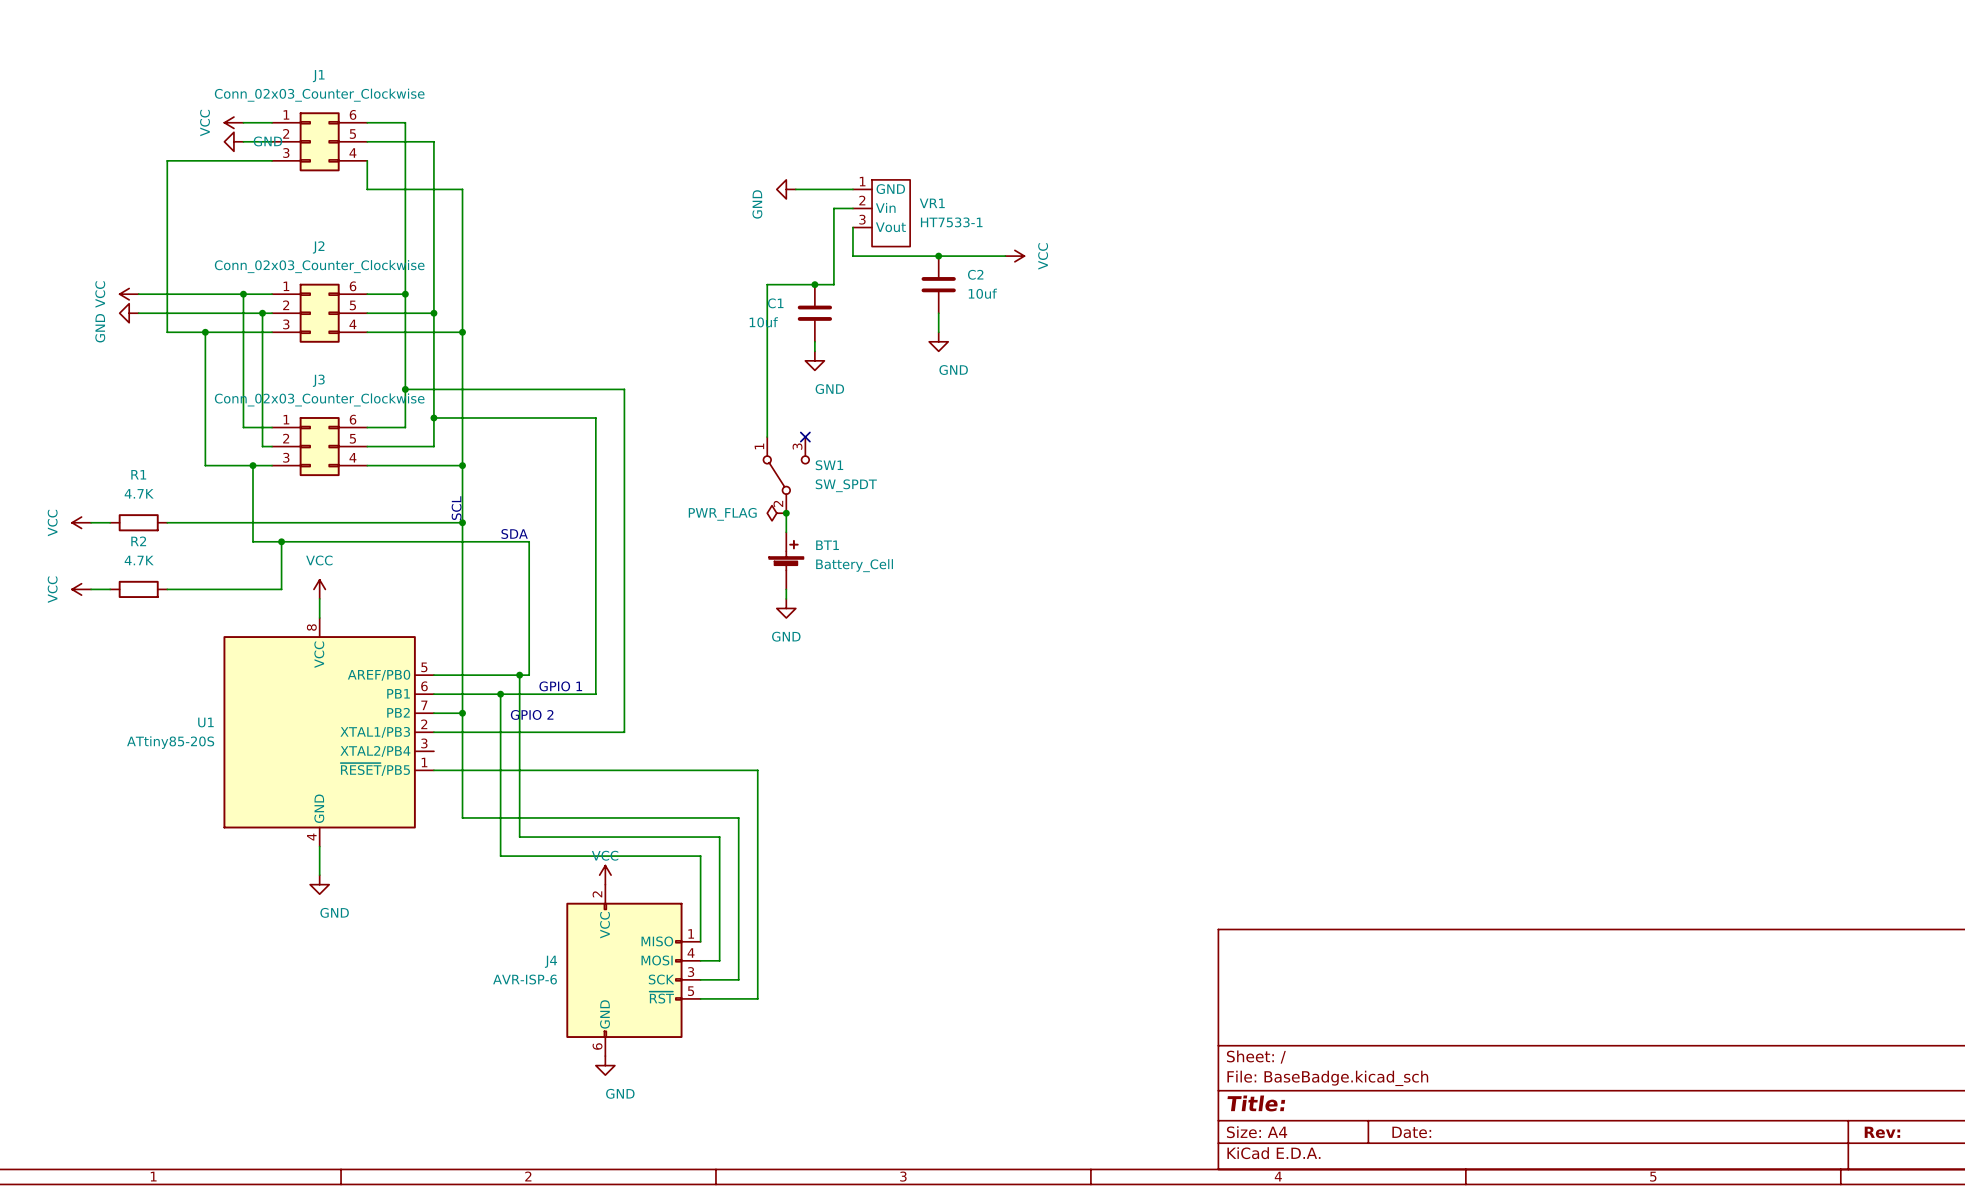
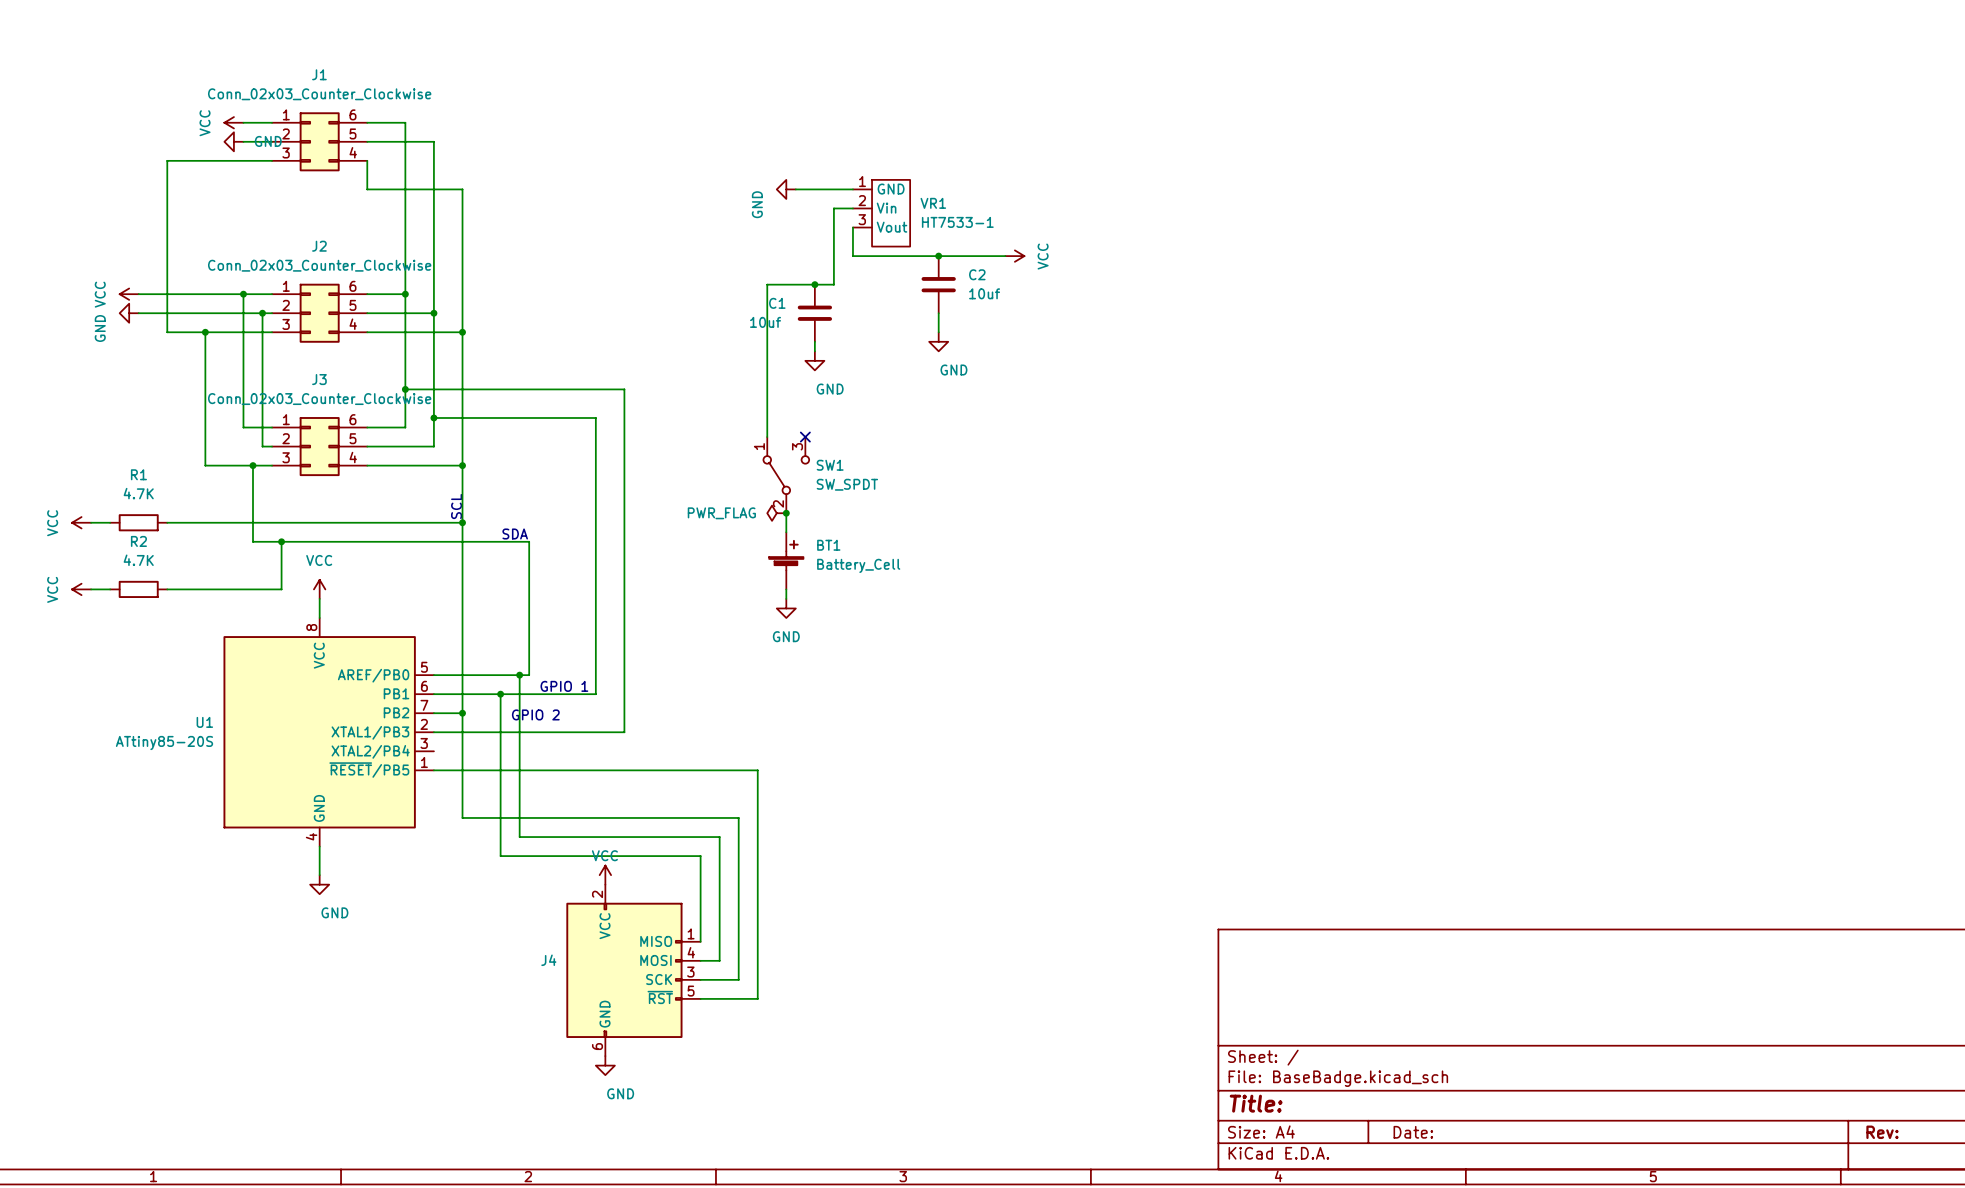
J4 value: AVR-ISP-6 (525, 979) -> none

